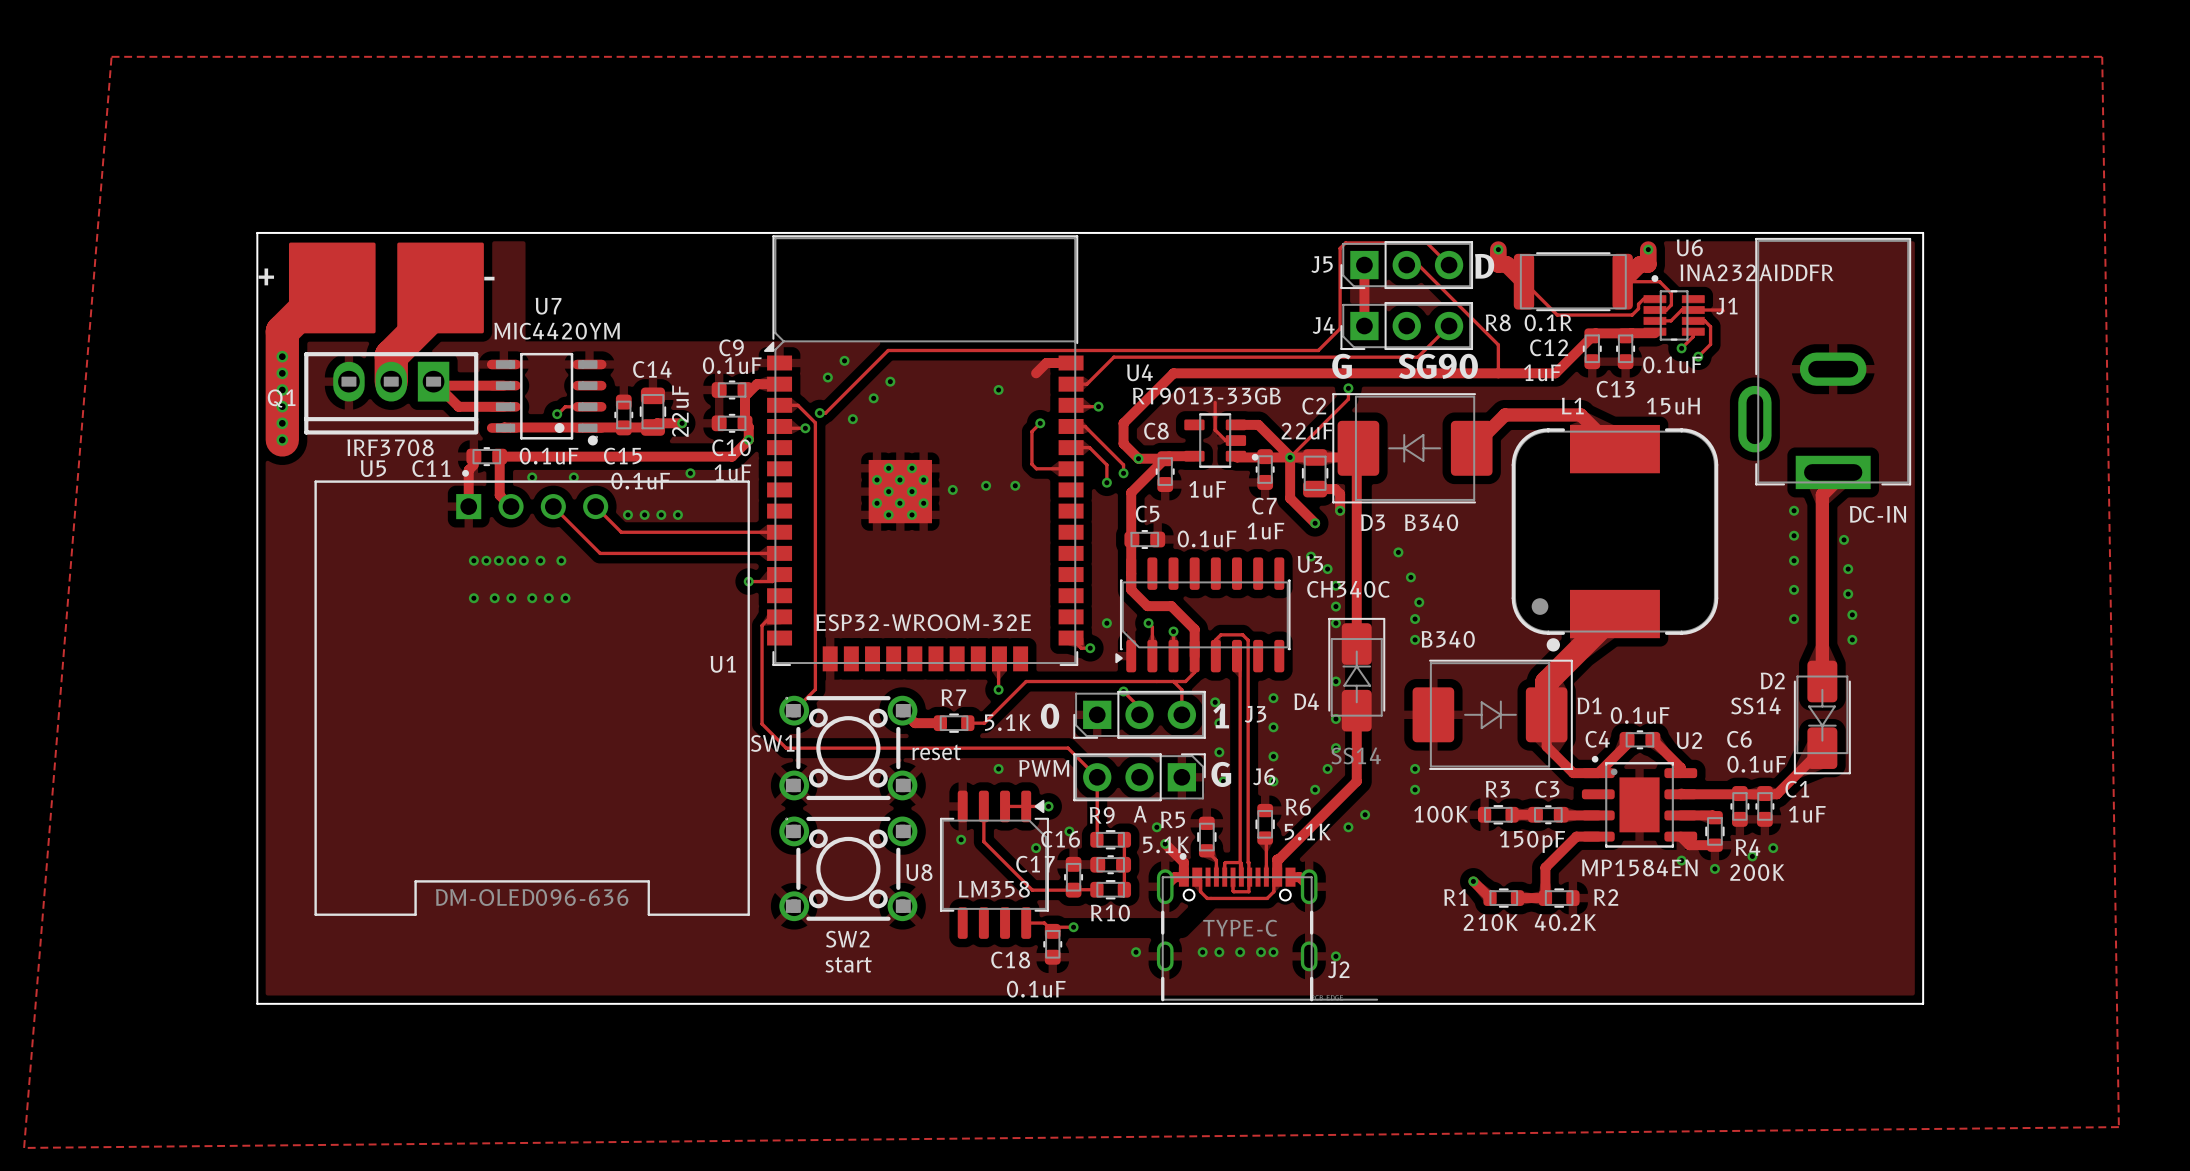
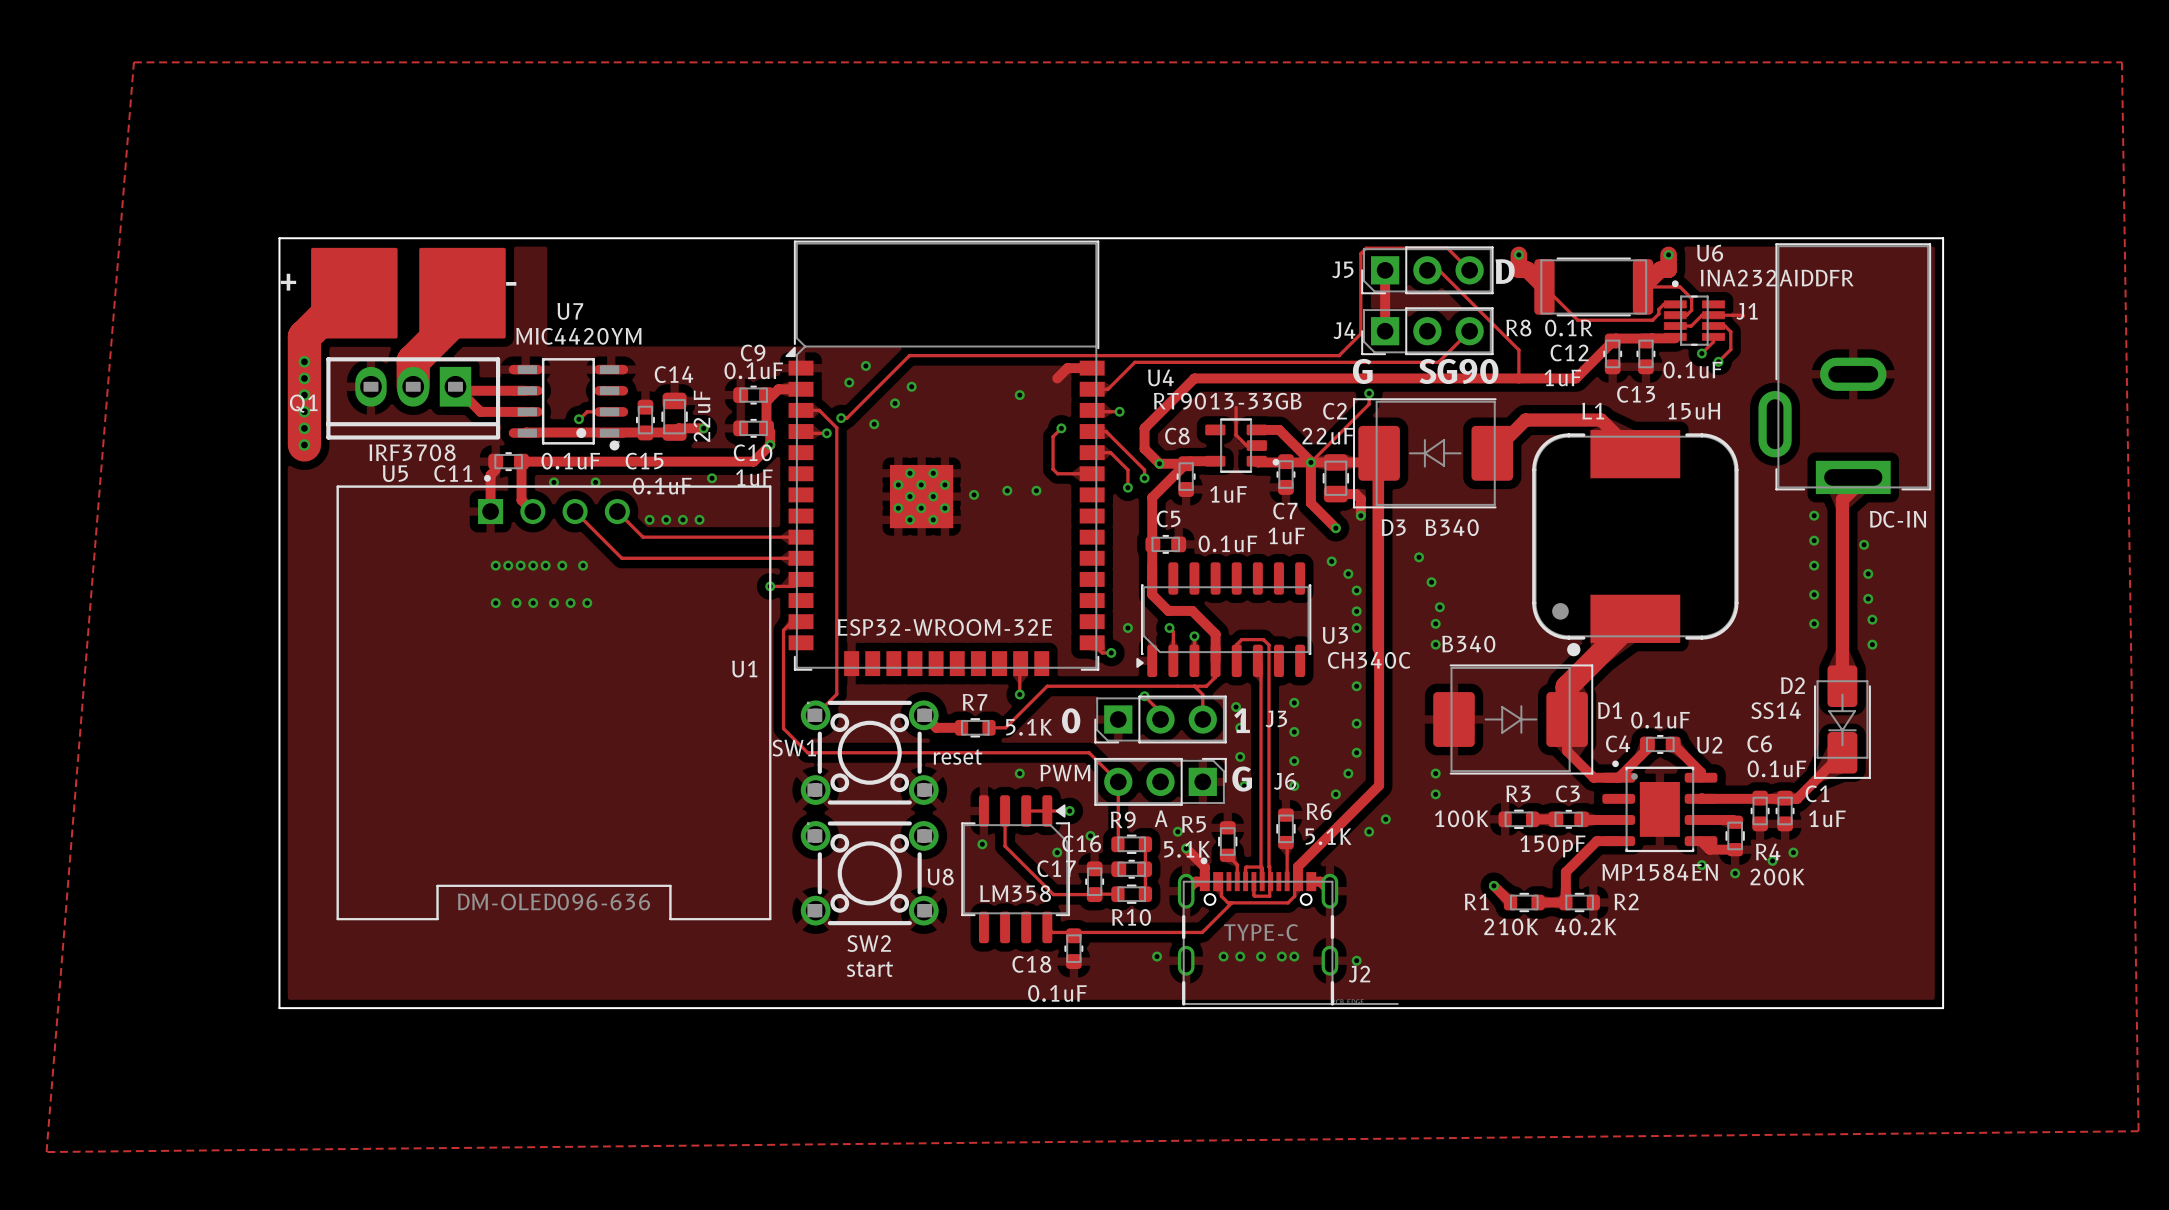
U3 name position: U3 (1310, 564) -> U3 (1335, 635)
U3 value position: CH340C (1348, 589) -> CH340C (1369, 660)
D4: SS14 (1356, 674) -> none
track: (1356, 710) (1356, 781) (1277, 859) (1277, 862) -> (1379, 453) (1379, 785) (1297, 866)
track: (1026, 923) (1044, 923) (1052, 931) (1056, 927) (1073, 927) -> (1047, 927) (1052, 932) (1202, 932) (1231, 902)
via: (1073, 927) -> none

